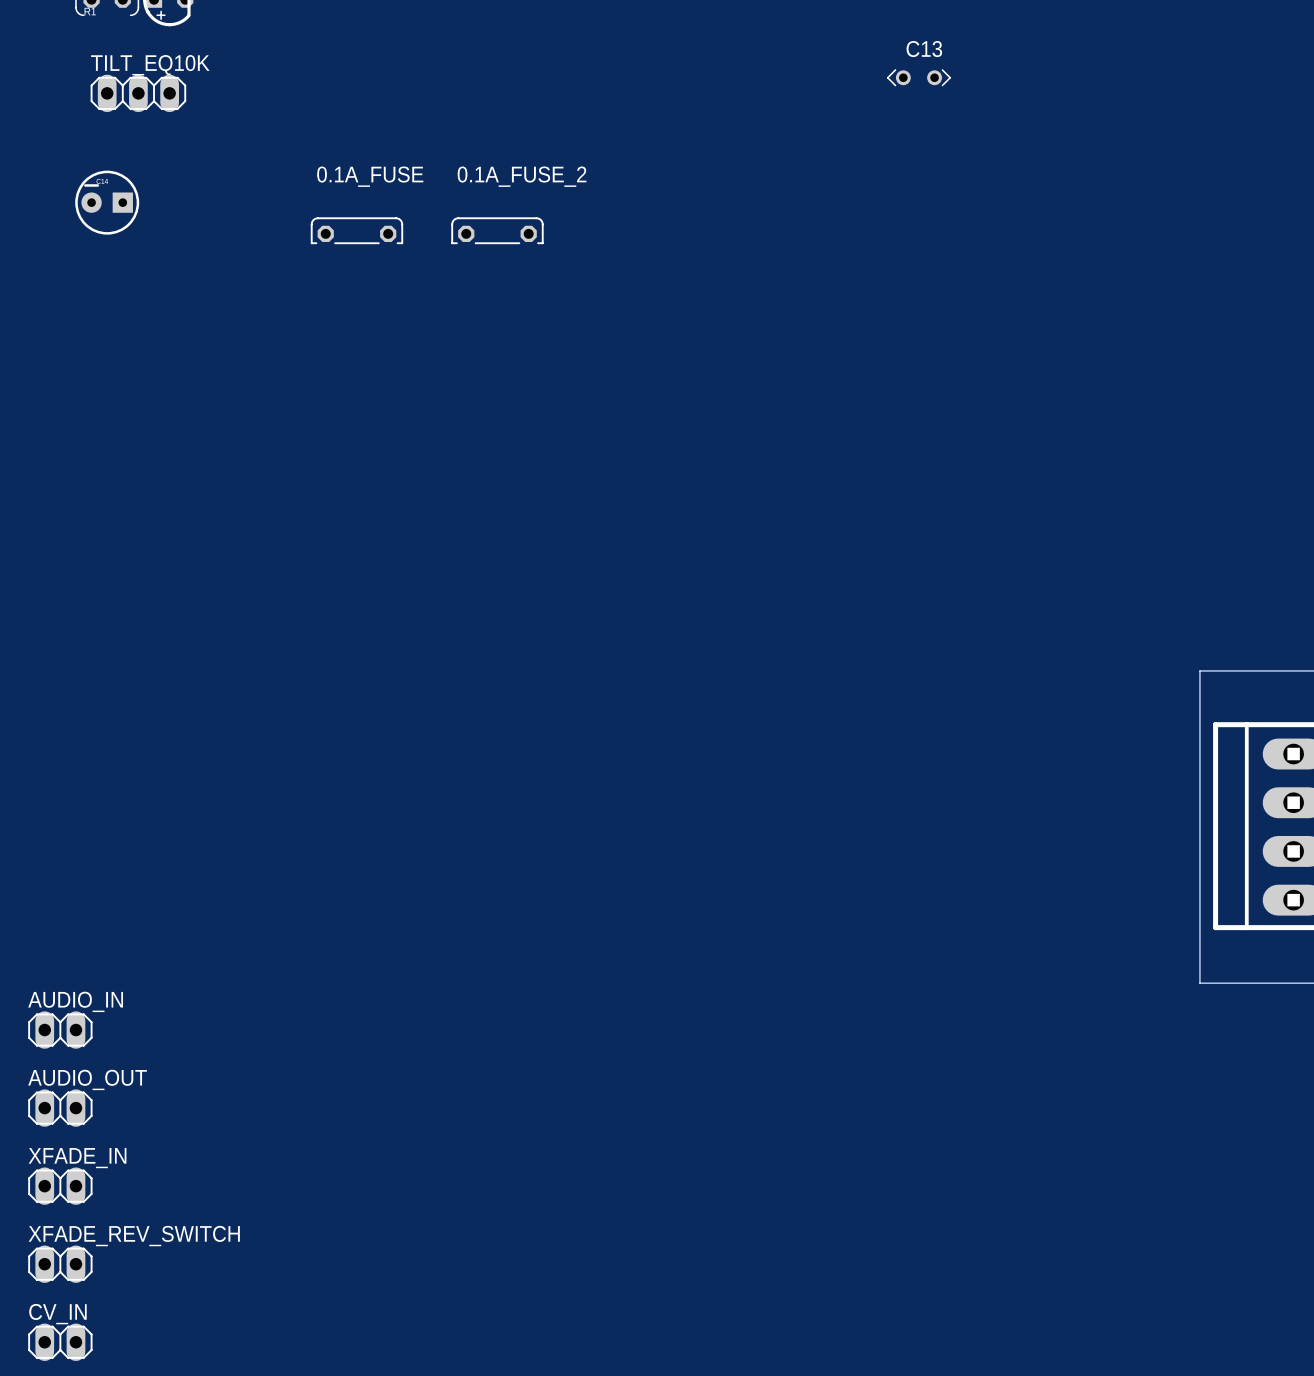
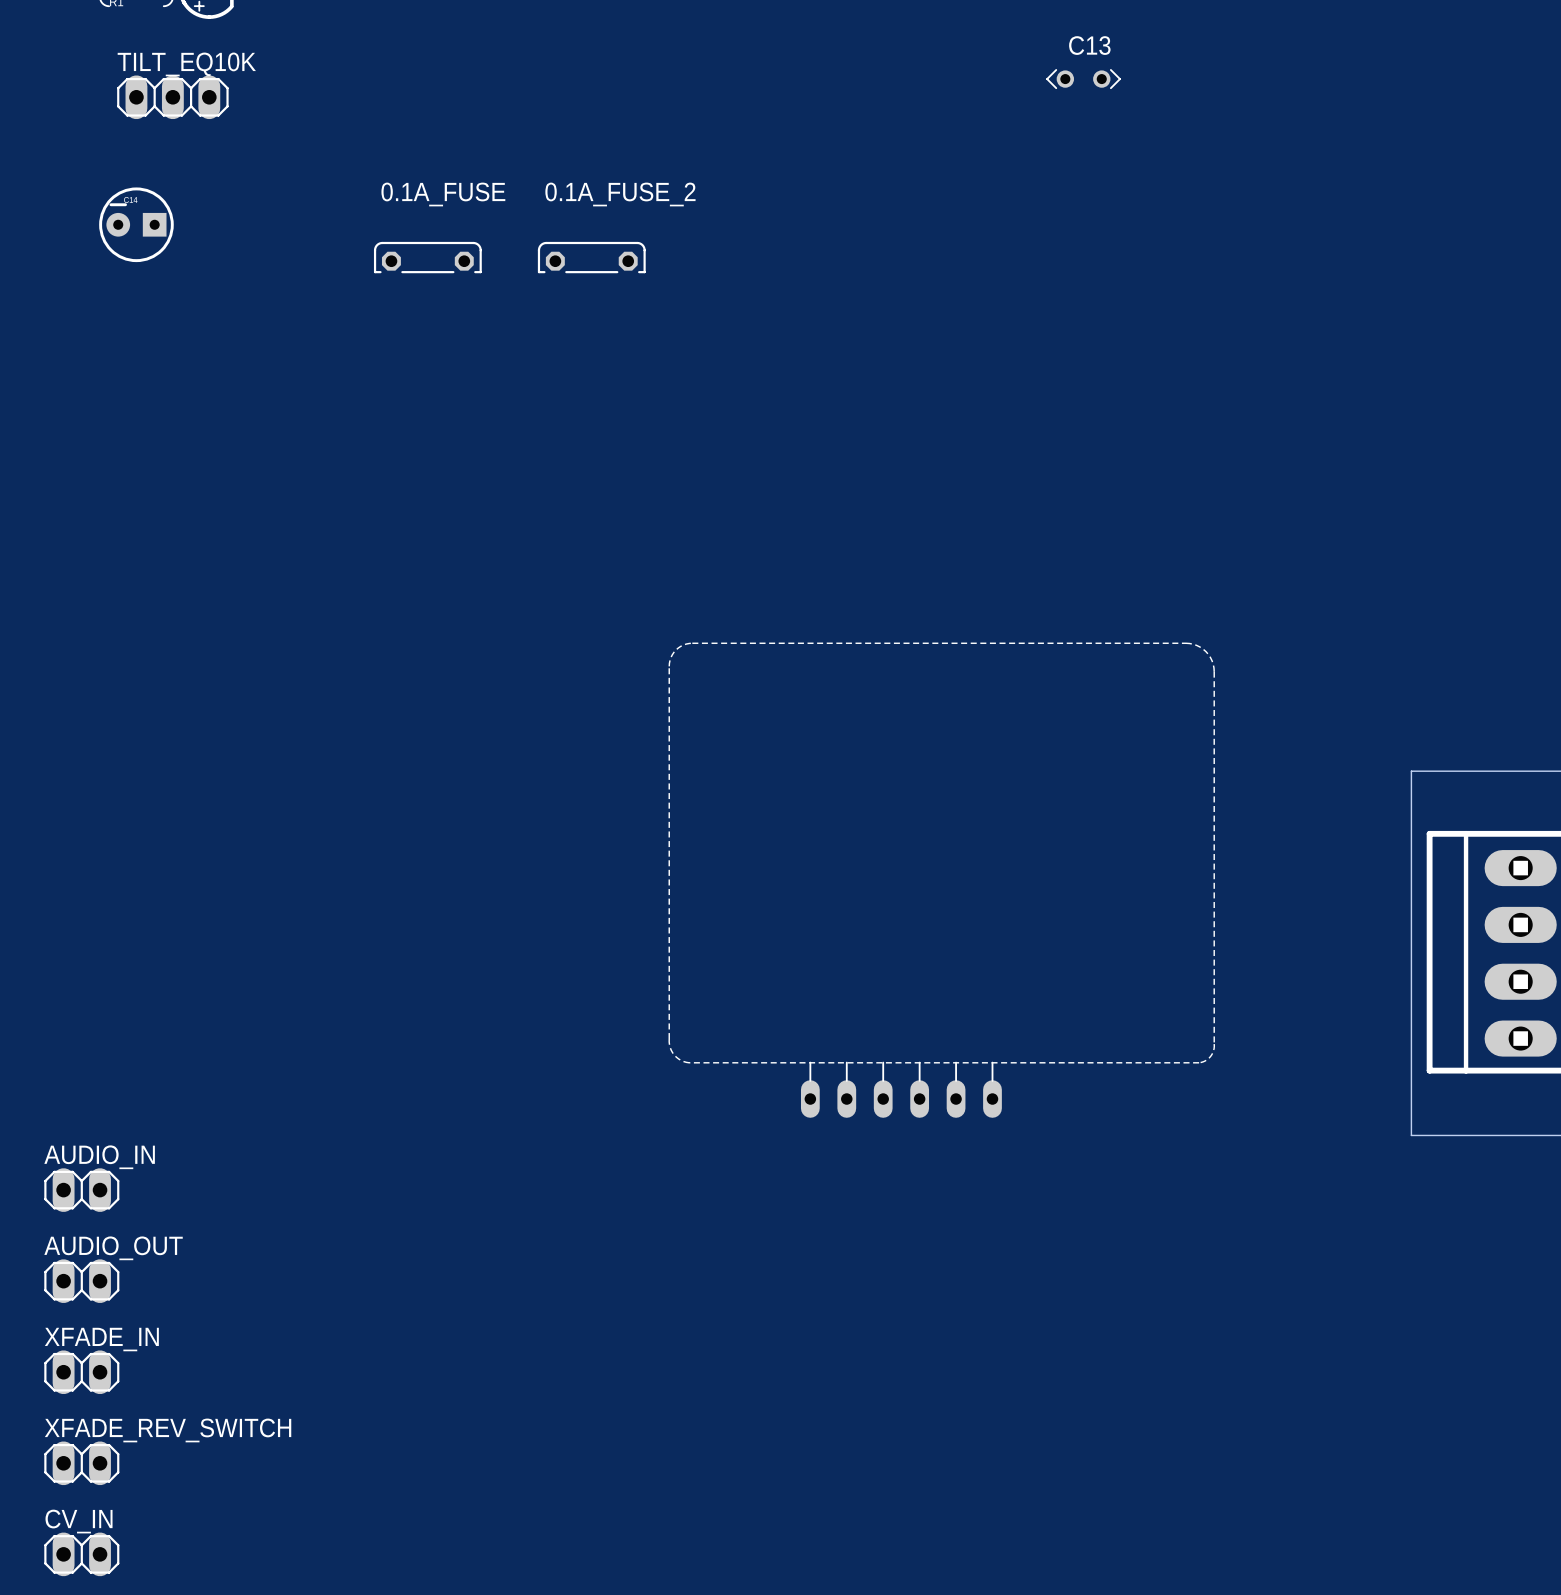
part: none -> (941, 880)

